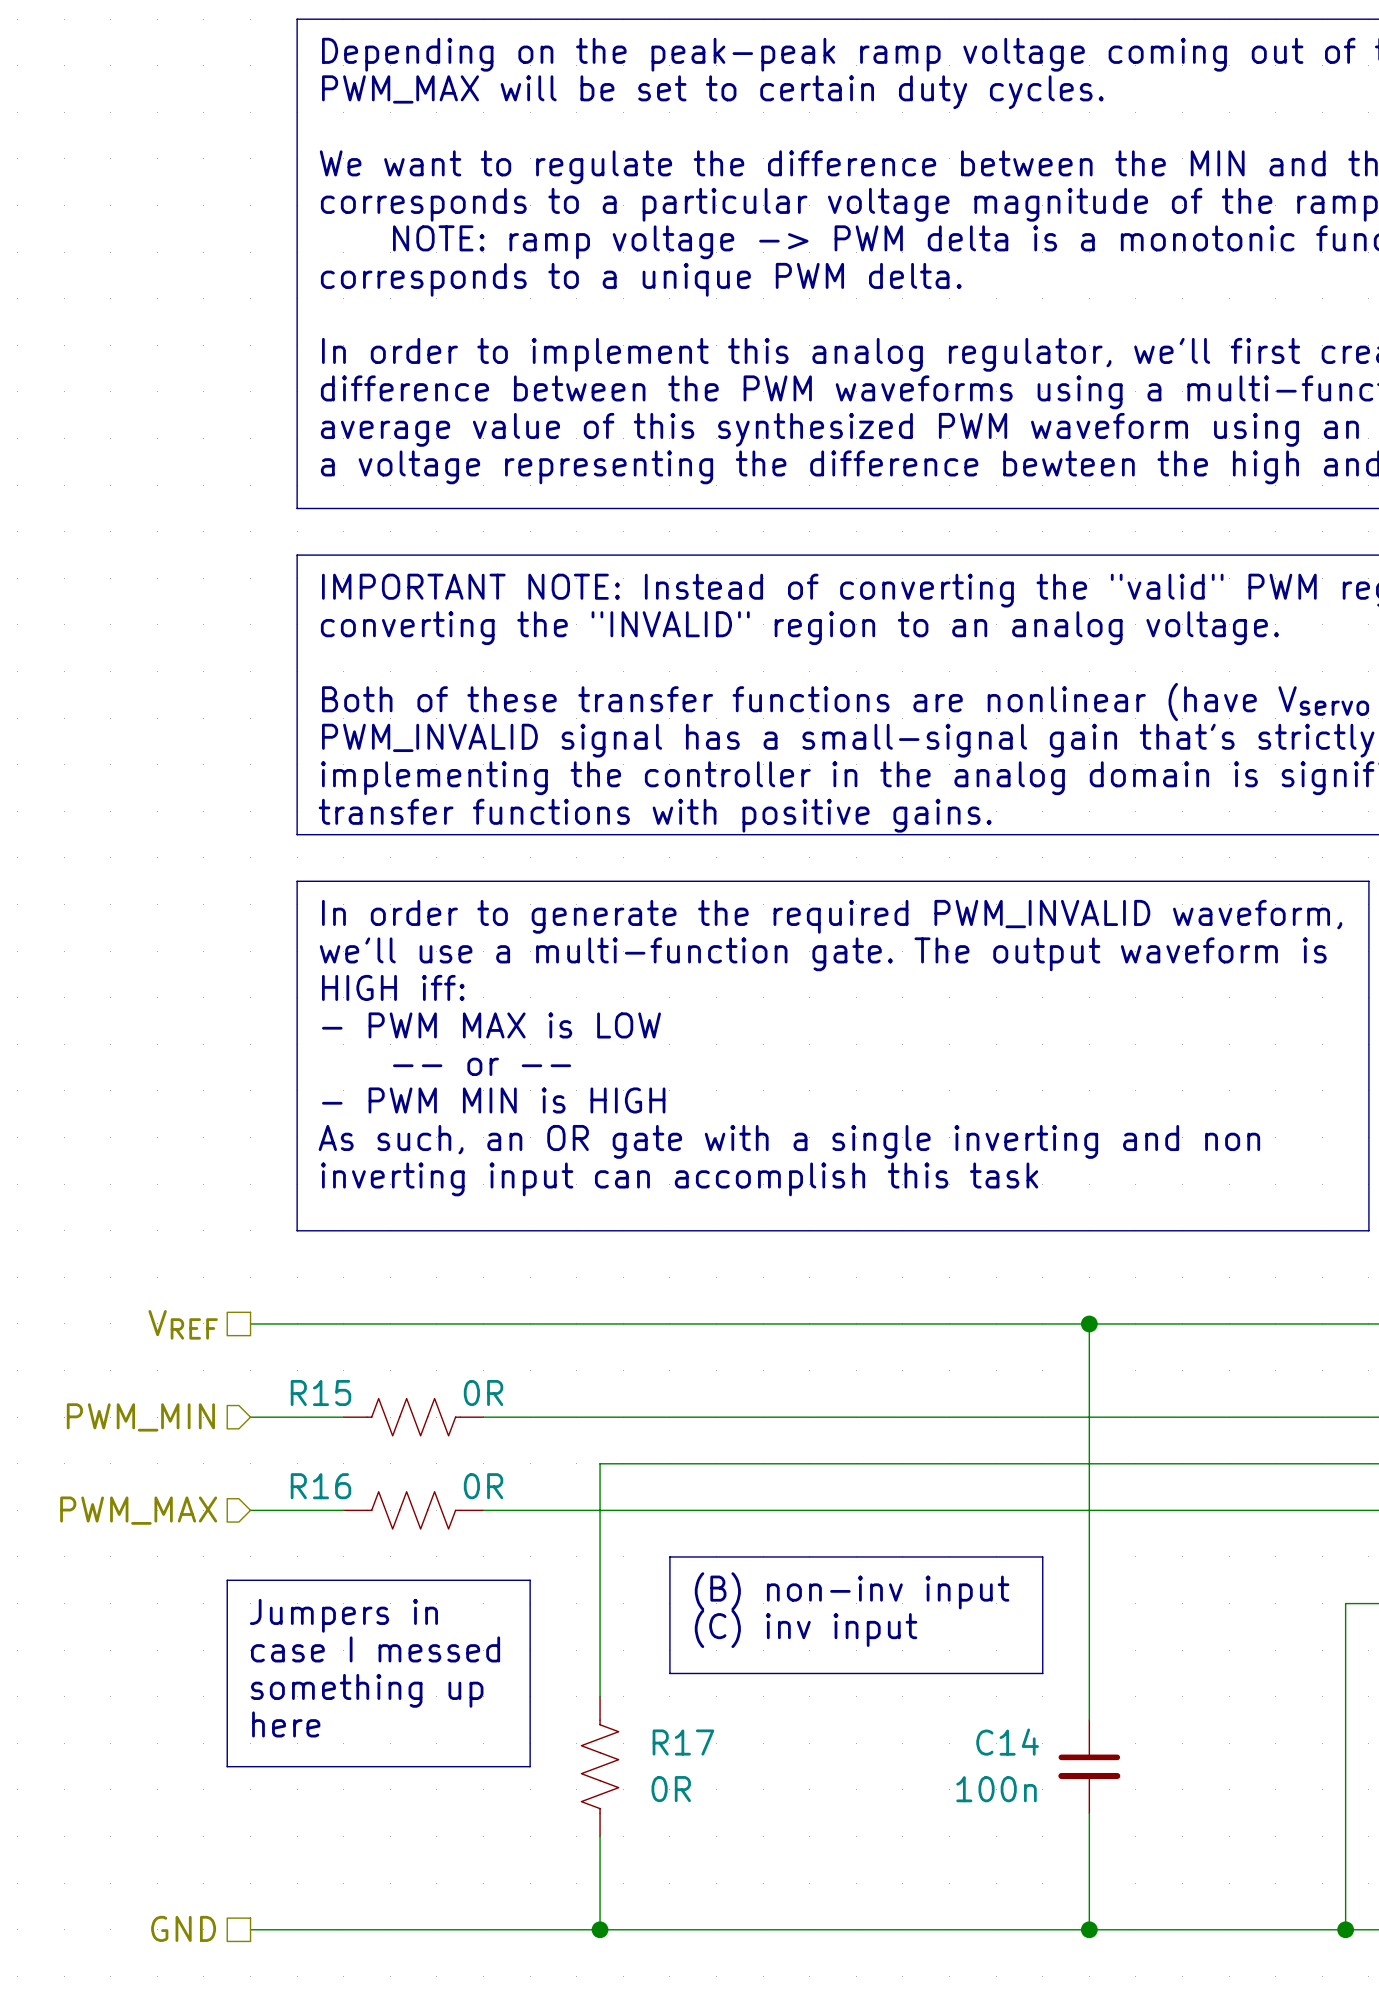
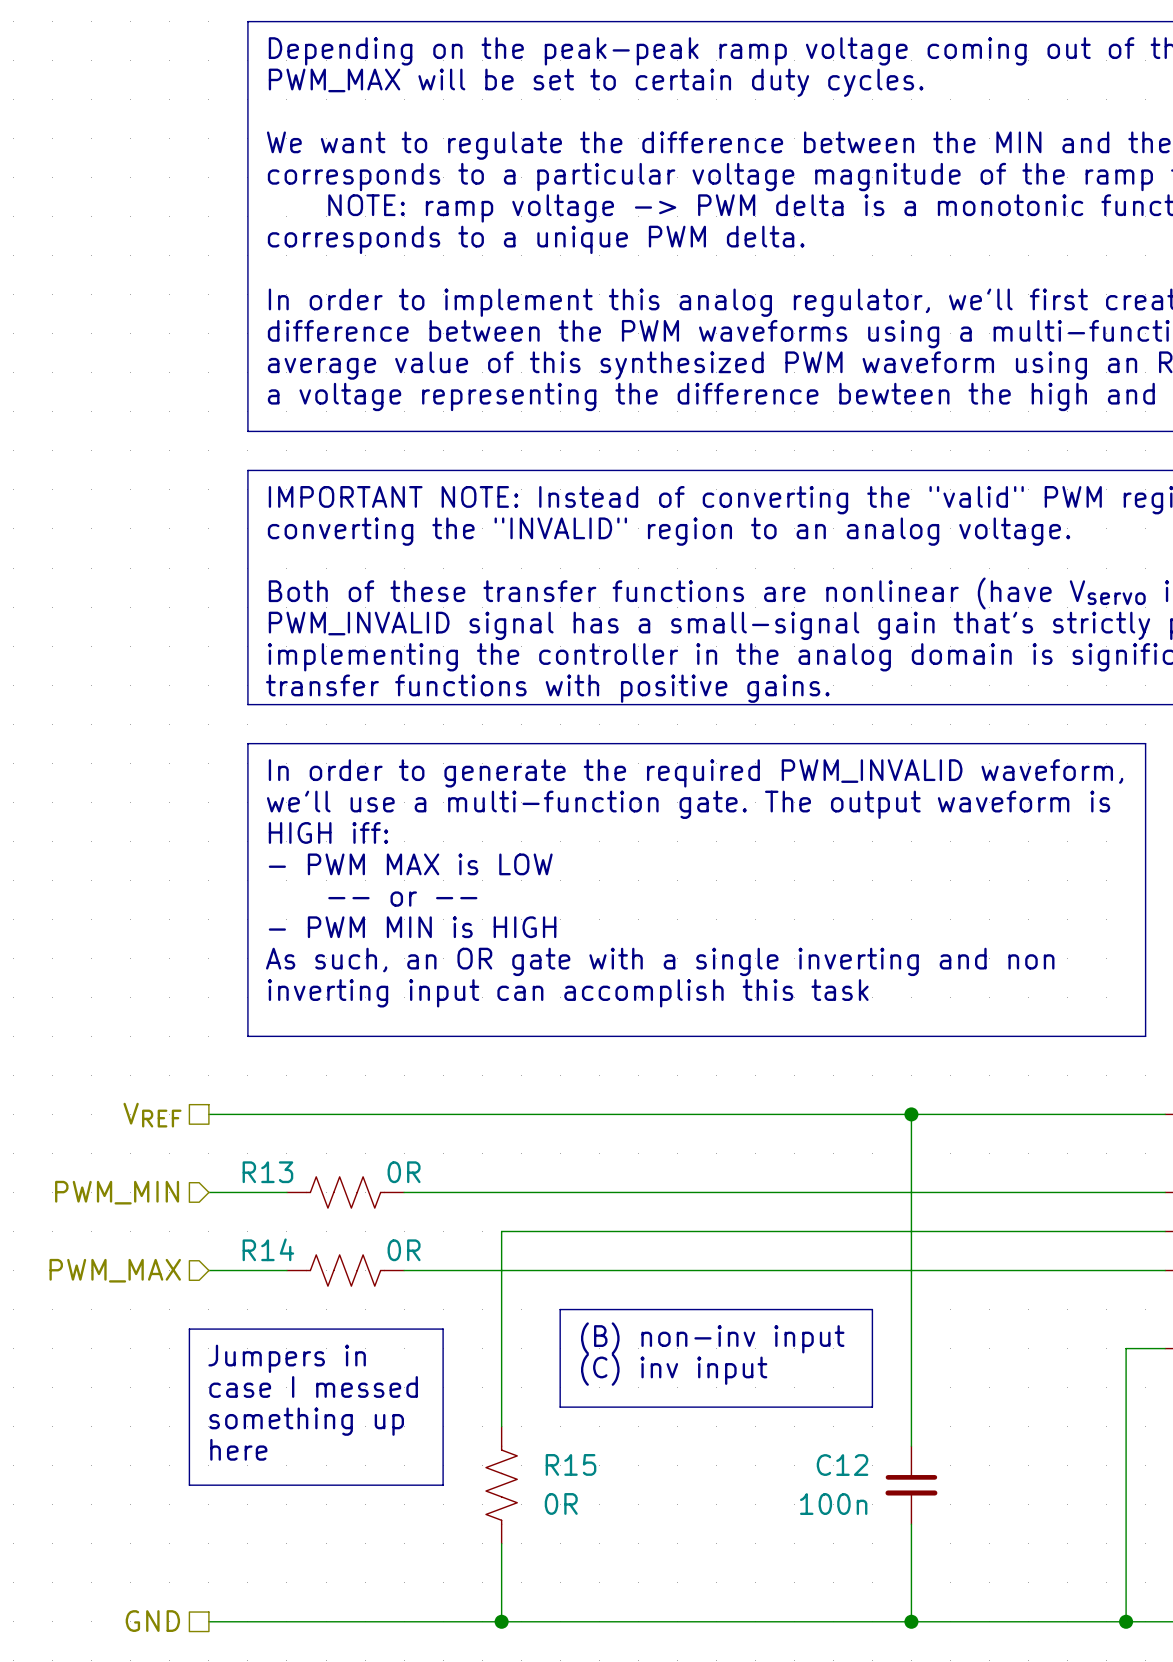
R15 name: R15 (320, 1393) -> R13 (267, 1172)
R16 name: R16 (320, 1486) -> R14 (268, 1249)
R17 name: R17 (683, 1742) -> R15 (571, 1464)
C14 name: C14 (1007, 1742) -> C12 (842, 1465)

